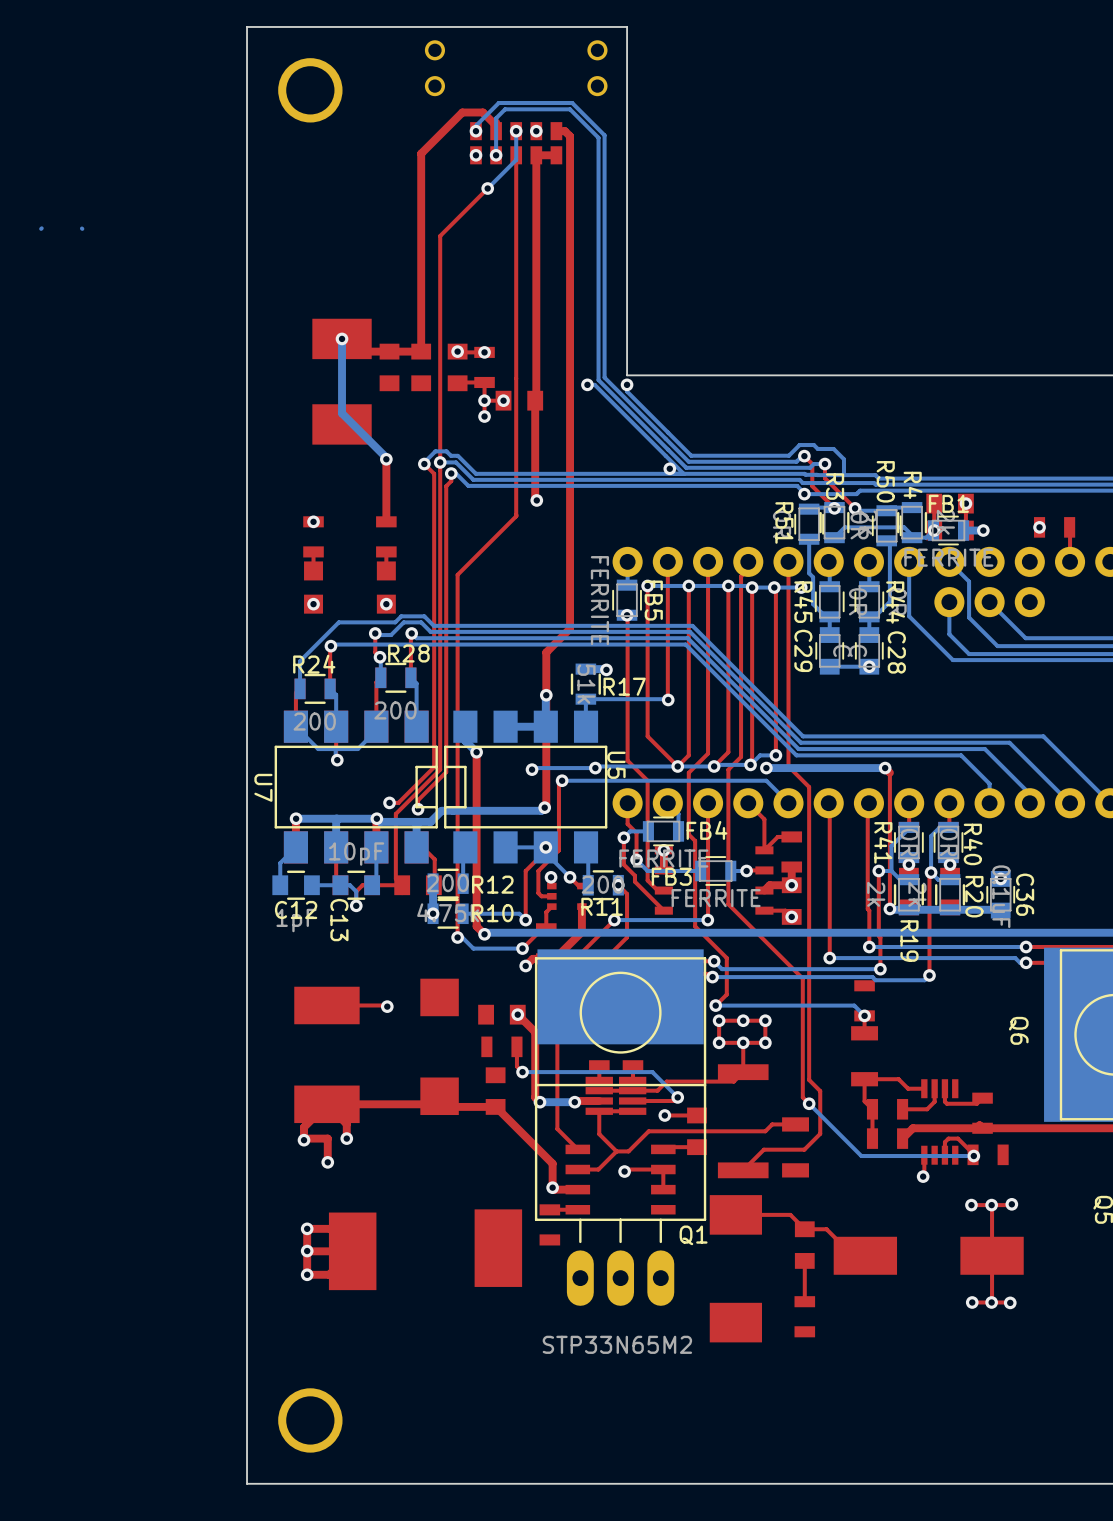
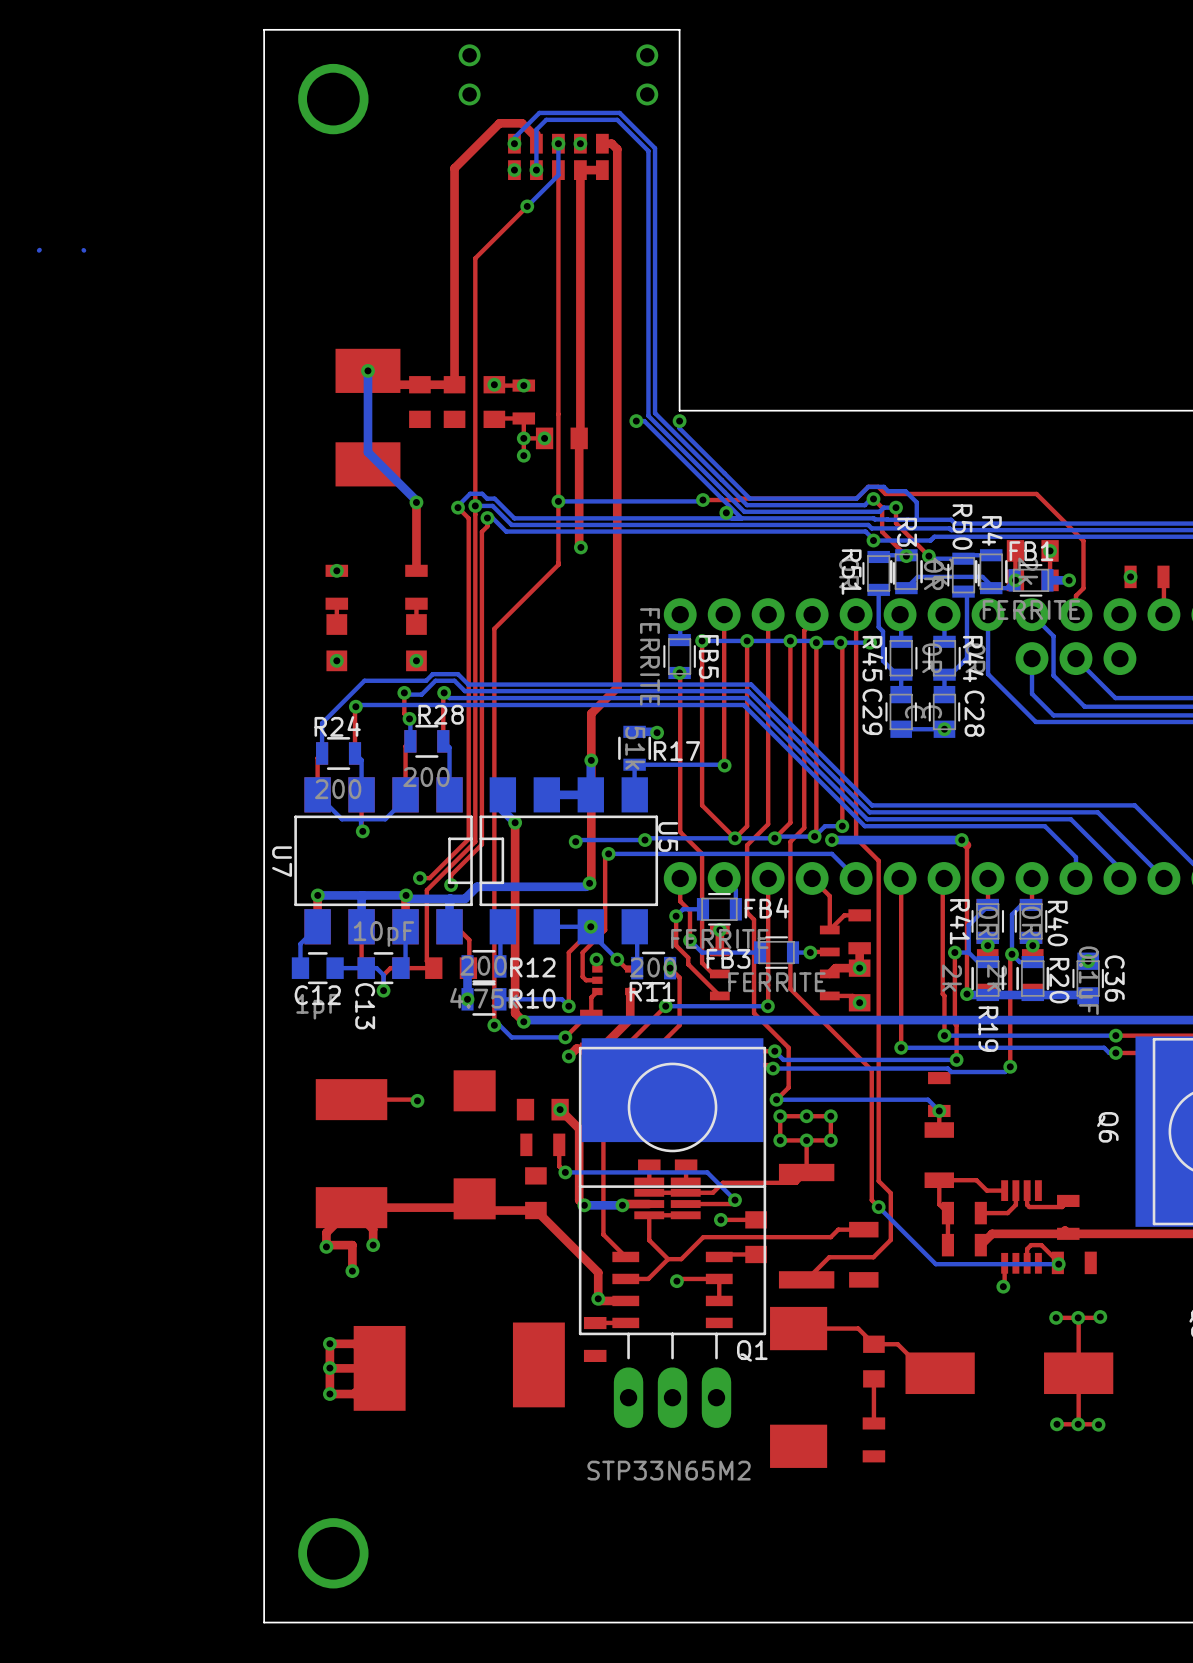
bottom track: none -> (702, 500) (558, 501)
top track: none -> (702, 500) (856, 498) (868, 486) (878, 486) (885, 493) (1036, 493) (1083, 540) (1083, 588) (1075, 595) (1075, 614)
via: none -> (702, 500)
via: none -> (558, 501)

